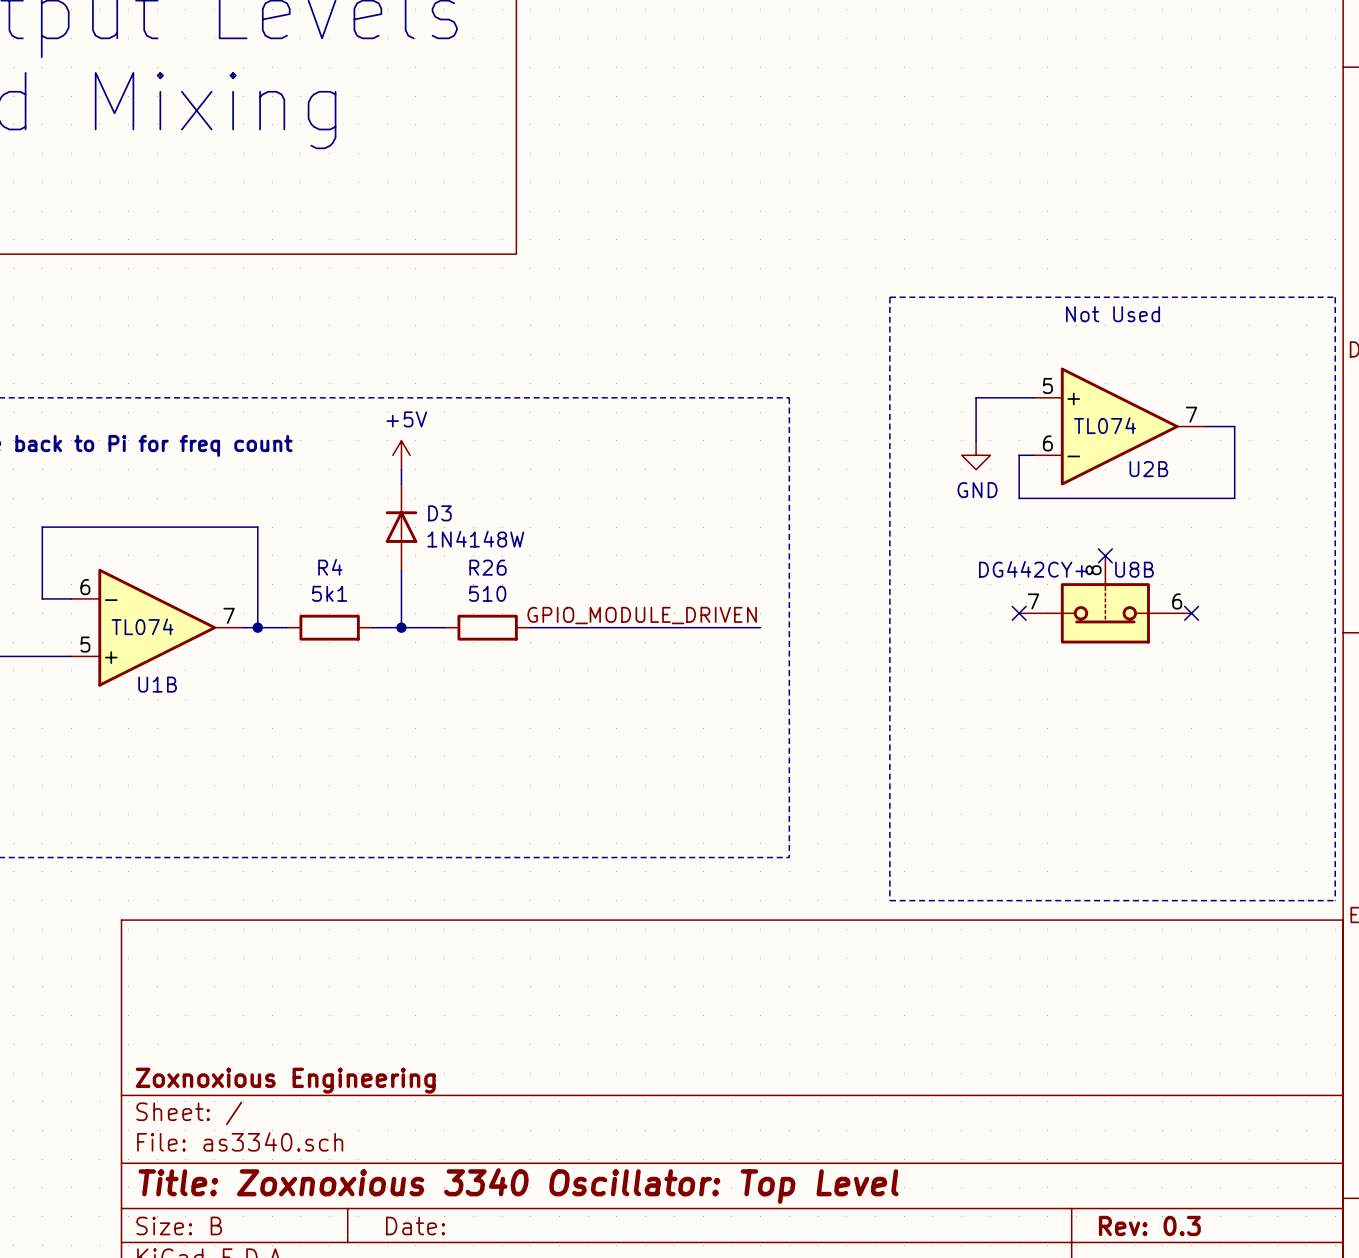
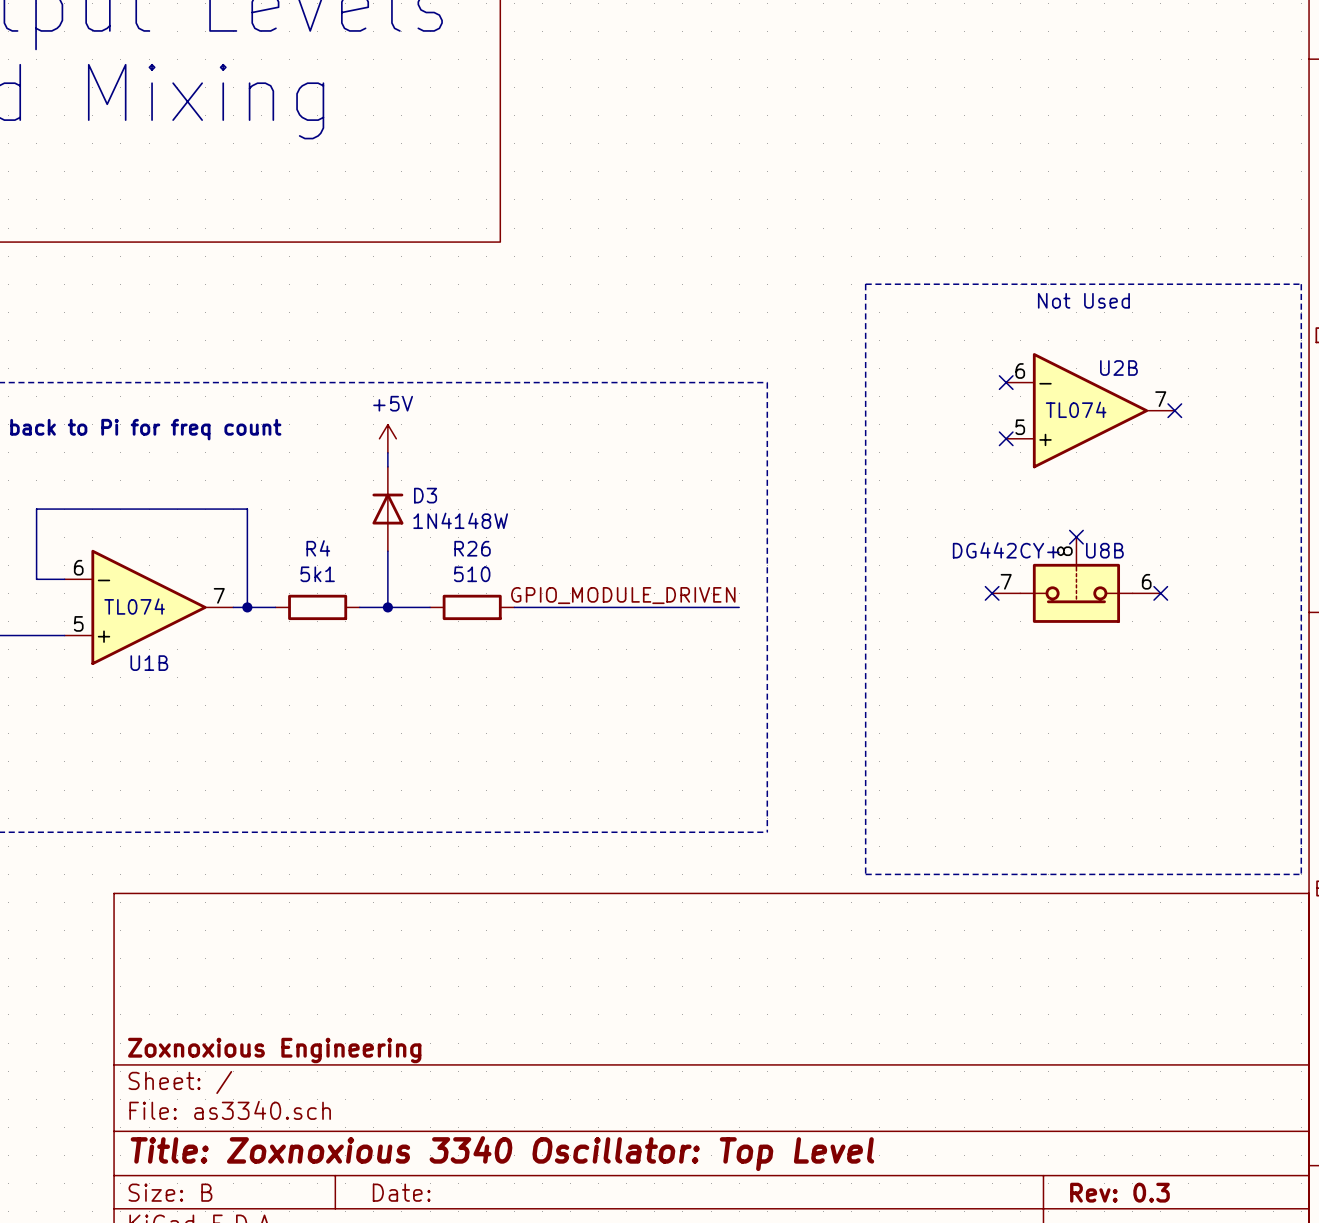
wire: (1033, 397) (976, 397) (976, 440) -> none
no-connect mark: none -> (1006, 382)
U2B flip: as is (1119, 426) -> up-down (1090, 410)
wire: (1205, 426) (1234, 426) (1234, 498) (1019, 498) (1019, 455) (1033, 455) -> none
no-connect mark: none -> (1174, 410)
power symbol: GND (976, 455) -> none
no-connect mark: none -> (1006, 438)

